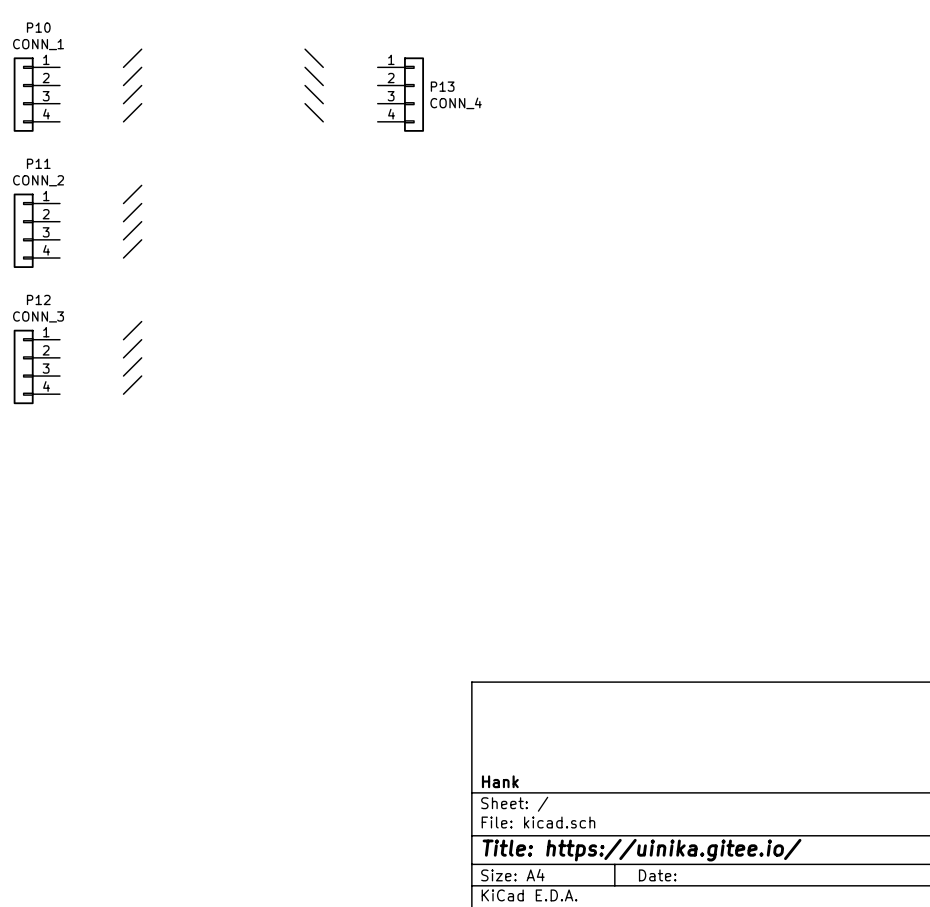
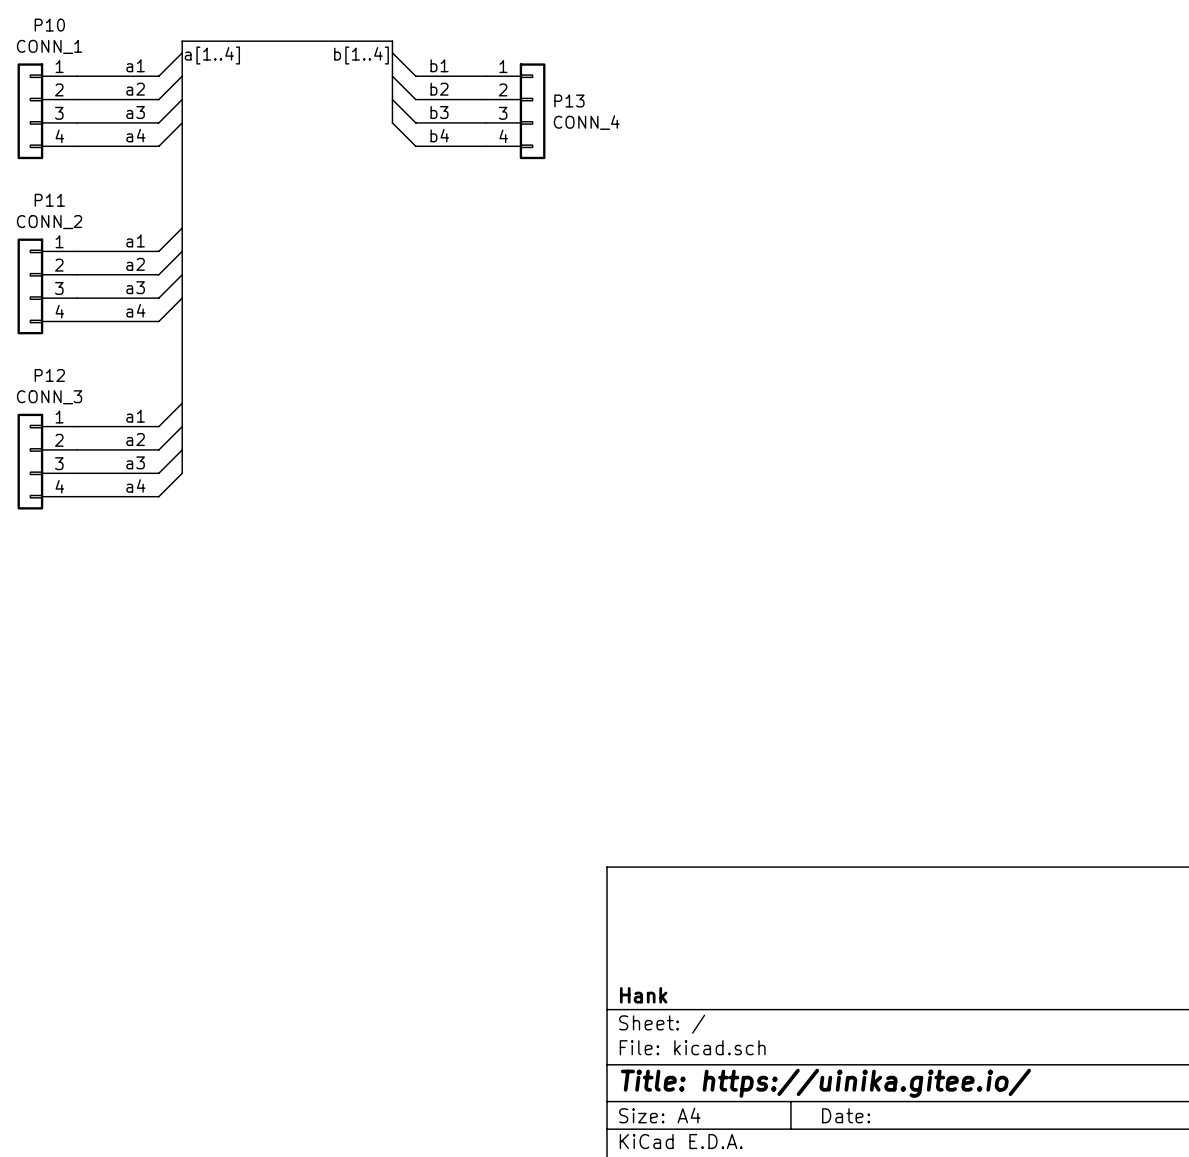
label: none -> a[1..4] (212, 55)
label: none -> b[1..4] (361, 55)
label: none -> a1 (135, 65)
label: none -> b1 (439, 65)
wire: none -> (77, 76) (158, 76)
wire: none -> (415, 76) (485, 76)
label: none -> a2 (135, 89)
label: none -> b2 (439, 89)
wire: none -> (77, 99) (158, 99)
wire: none -> (415, 99) (485, 99)
label: none -> a3 (135, 112)
label: none -> b3 (439, 112)
wire: none -> (77, 122) (158, 122)
bus: none -> (392, 122) (392, 41) (182, 41) (182, 473)
wire: none -> (415, 122) (485, 122)
label: none -> a4 (135, 135)
label: none -> b4 (439, 135)
wire: none -> (77, 146) (158, 146)
wire: none -> (415, 146) (485, 146)
label: none -> a1 (135, 240)
wire: none -> (77, 251) (158, 251)
label: none -> a2 (135, 264)
wire: none -> (77, 274) (158, 274)
label: none -> a3 (135, 287)
wire: none -> (77, 298) (158, 298)
label: none -> a4 (135, 310)
wire: none -> (77, 321) (158, 321)
label: none -> a1 (135, 416)
wire: none -> (77, 426) (158, 426)
label: none -> a2 (135, 439)
wire: none -> (77, 449) (158, 449)
label: none -> a3 (135, 462)
wire: none -> (77, 473) (158, 473)
label: none -> a4 (135, 485)
wire: none -> (77, 496) (158, 496)

